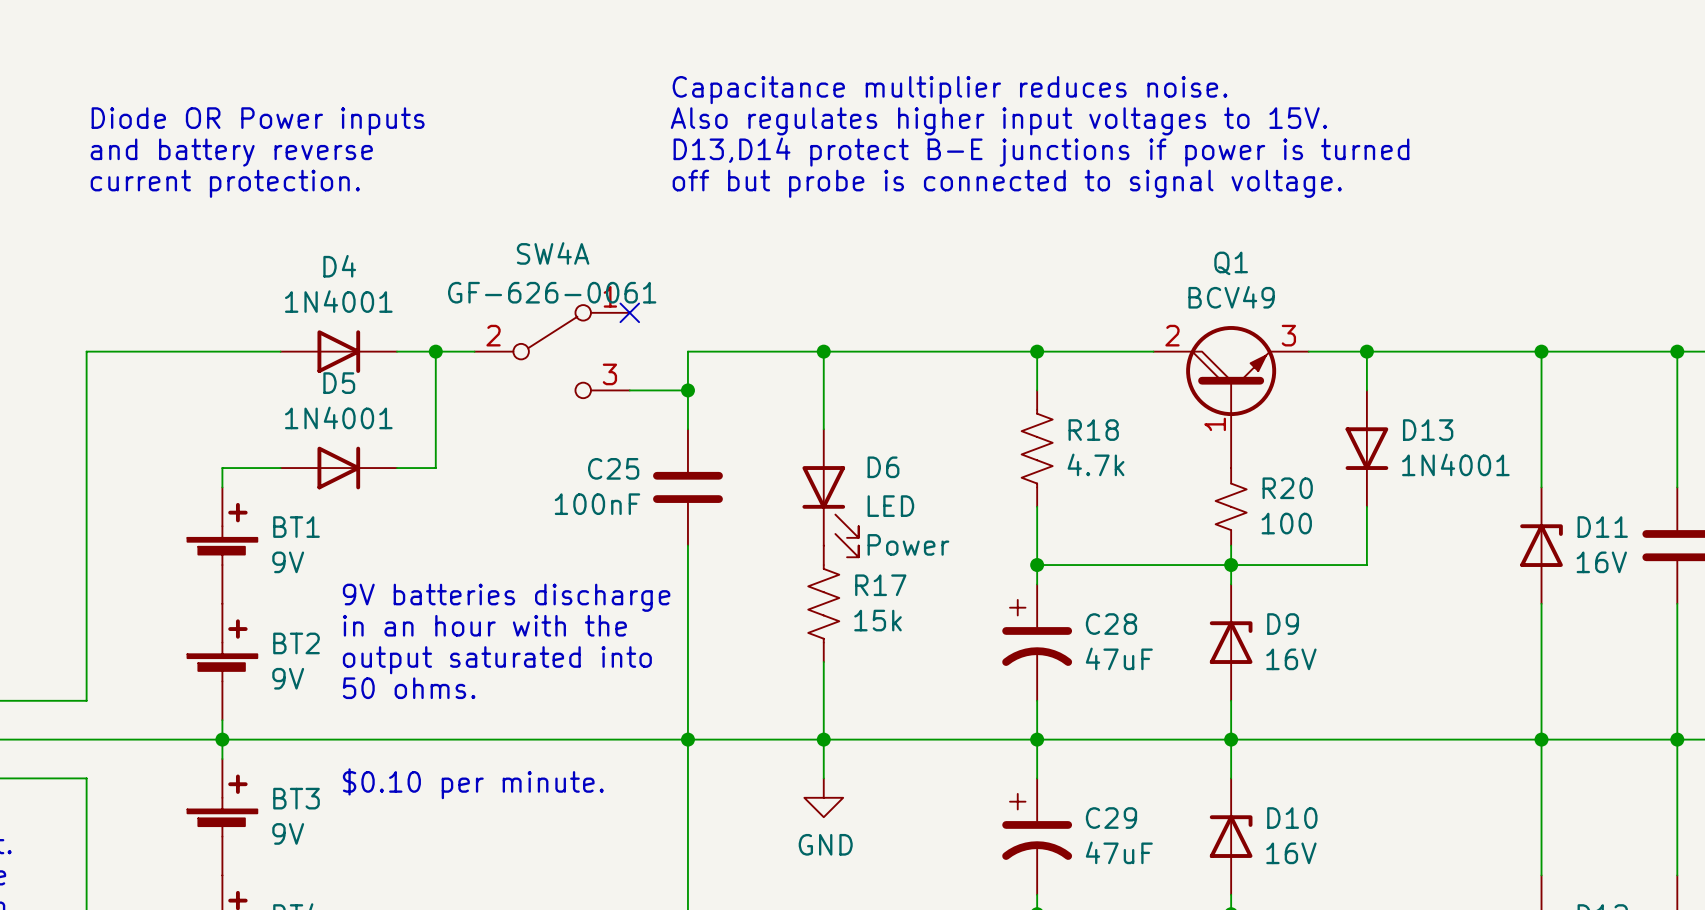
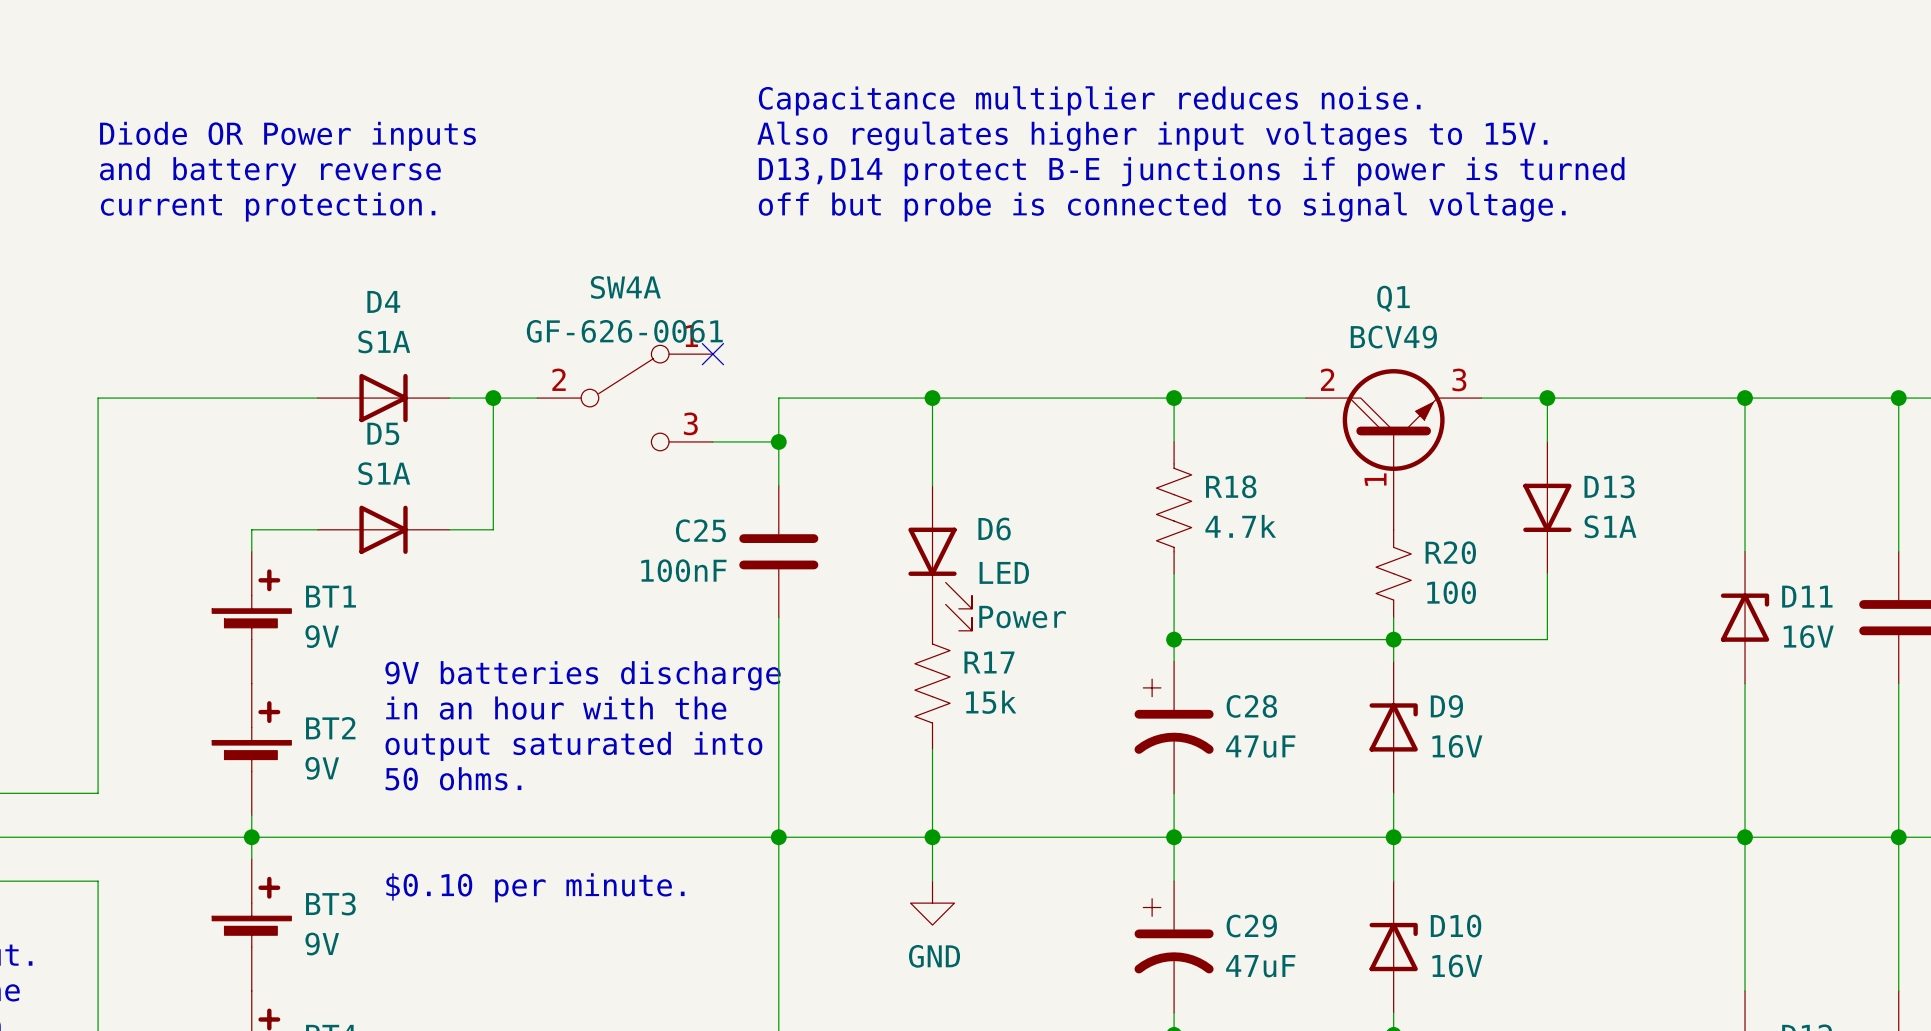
D4 value: 1N4001 (338, 301) -> S1A (384, 341)
D5 value: 1N4001 (338, 417) -> S1A (384, 473)
D13 value: 1N4001 (1455, 464) -> S1A (1610, 526)

